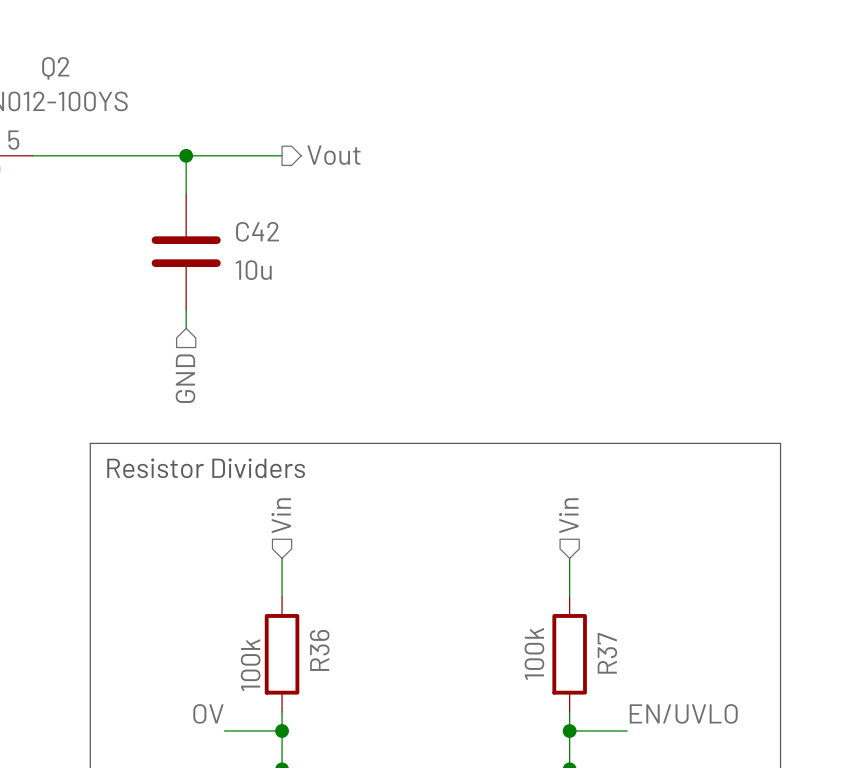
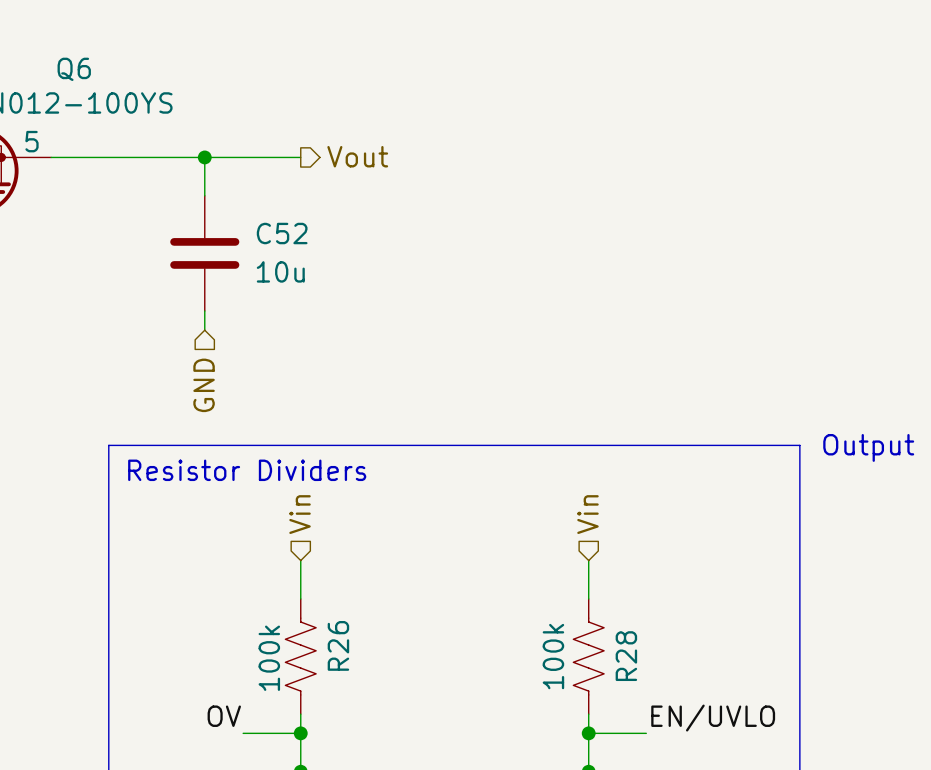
Q2 name: Q2 (55, 68) -> Q6 (74, 69)
C42 name: C42 (257, 231) -> C52 (282, 233)
R36: 100k (282, 654) -> none
R26: none -> 100k (300, 656)
R37: 100k (569, 654) -> none
R28: none -> 100k (588, 656)

